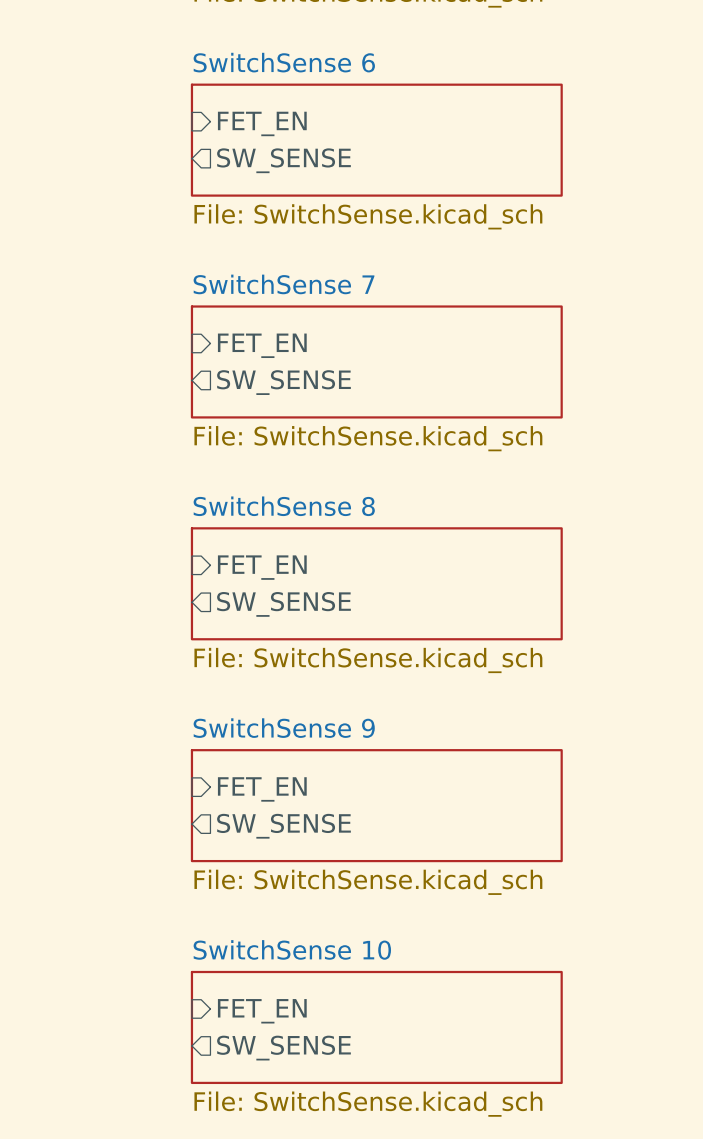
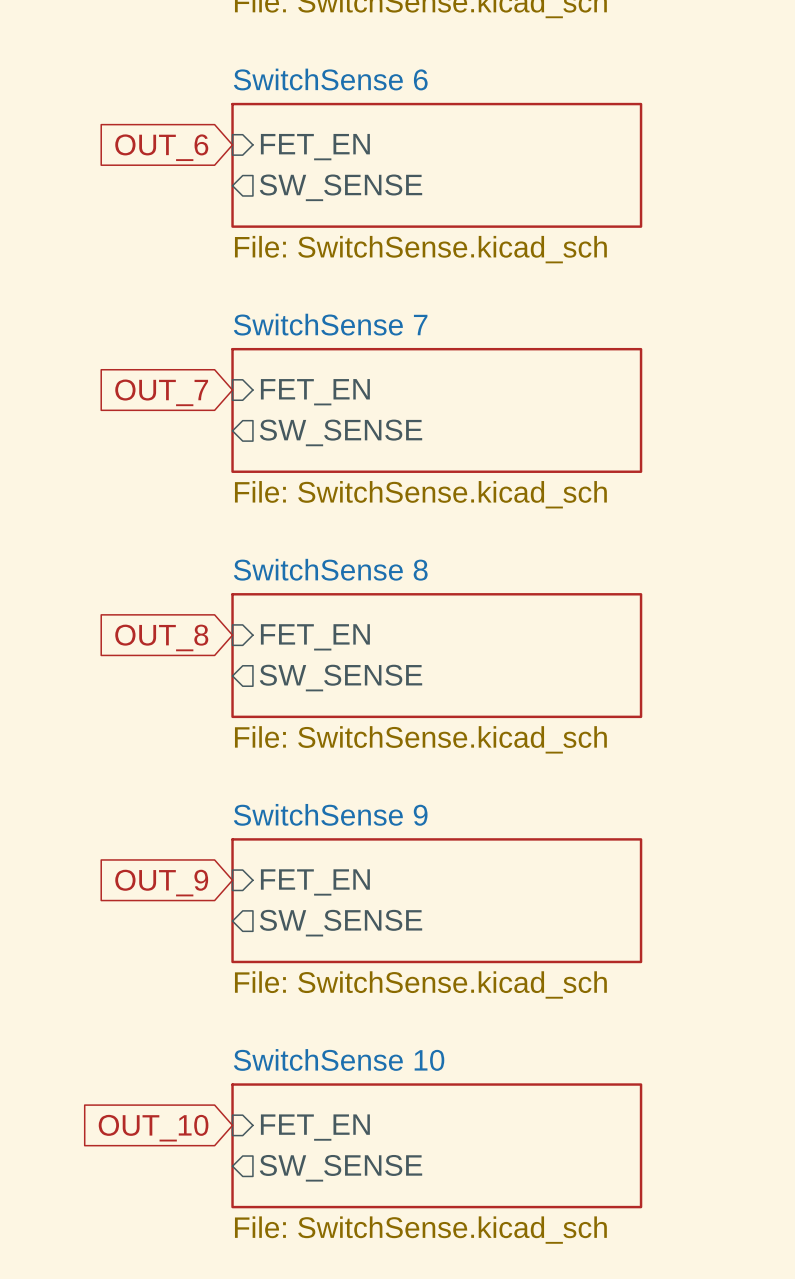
global label: none -> OUT_6 (161, 147)
global label: none -> OUT_7 (161, 392)
global label: none -> OUT_8 (161, 637)
global label: none -> OUT_9 (161, 883)
global label: none -> OUT_10 (153, 1128)

